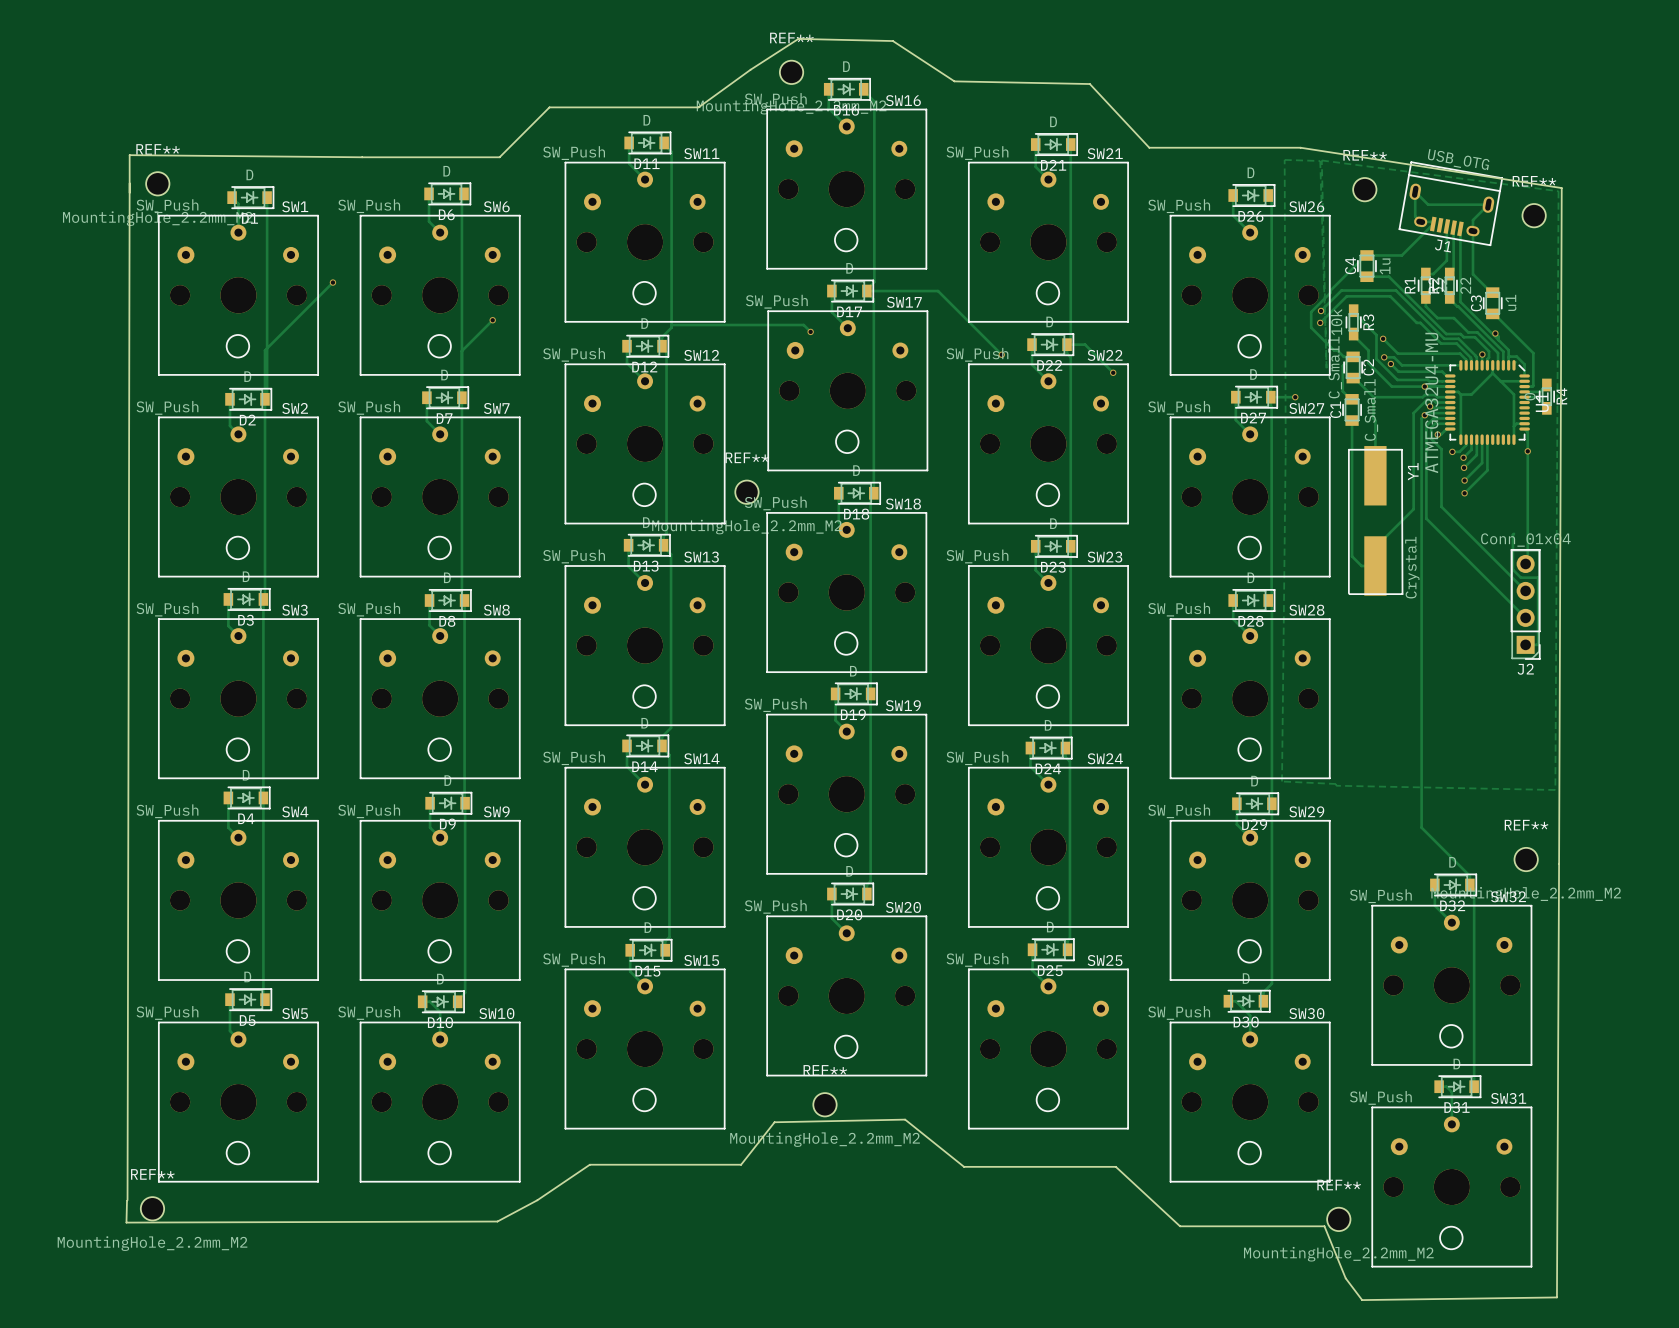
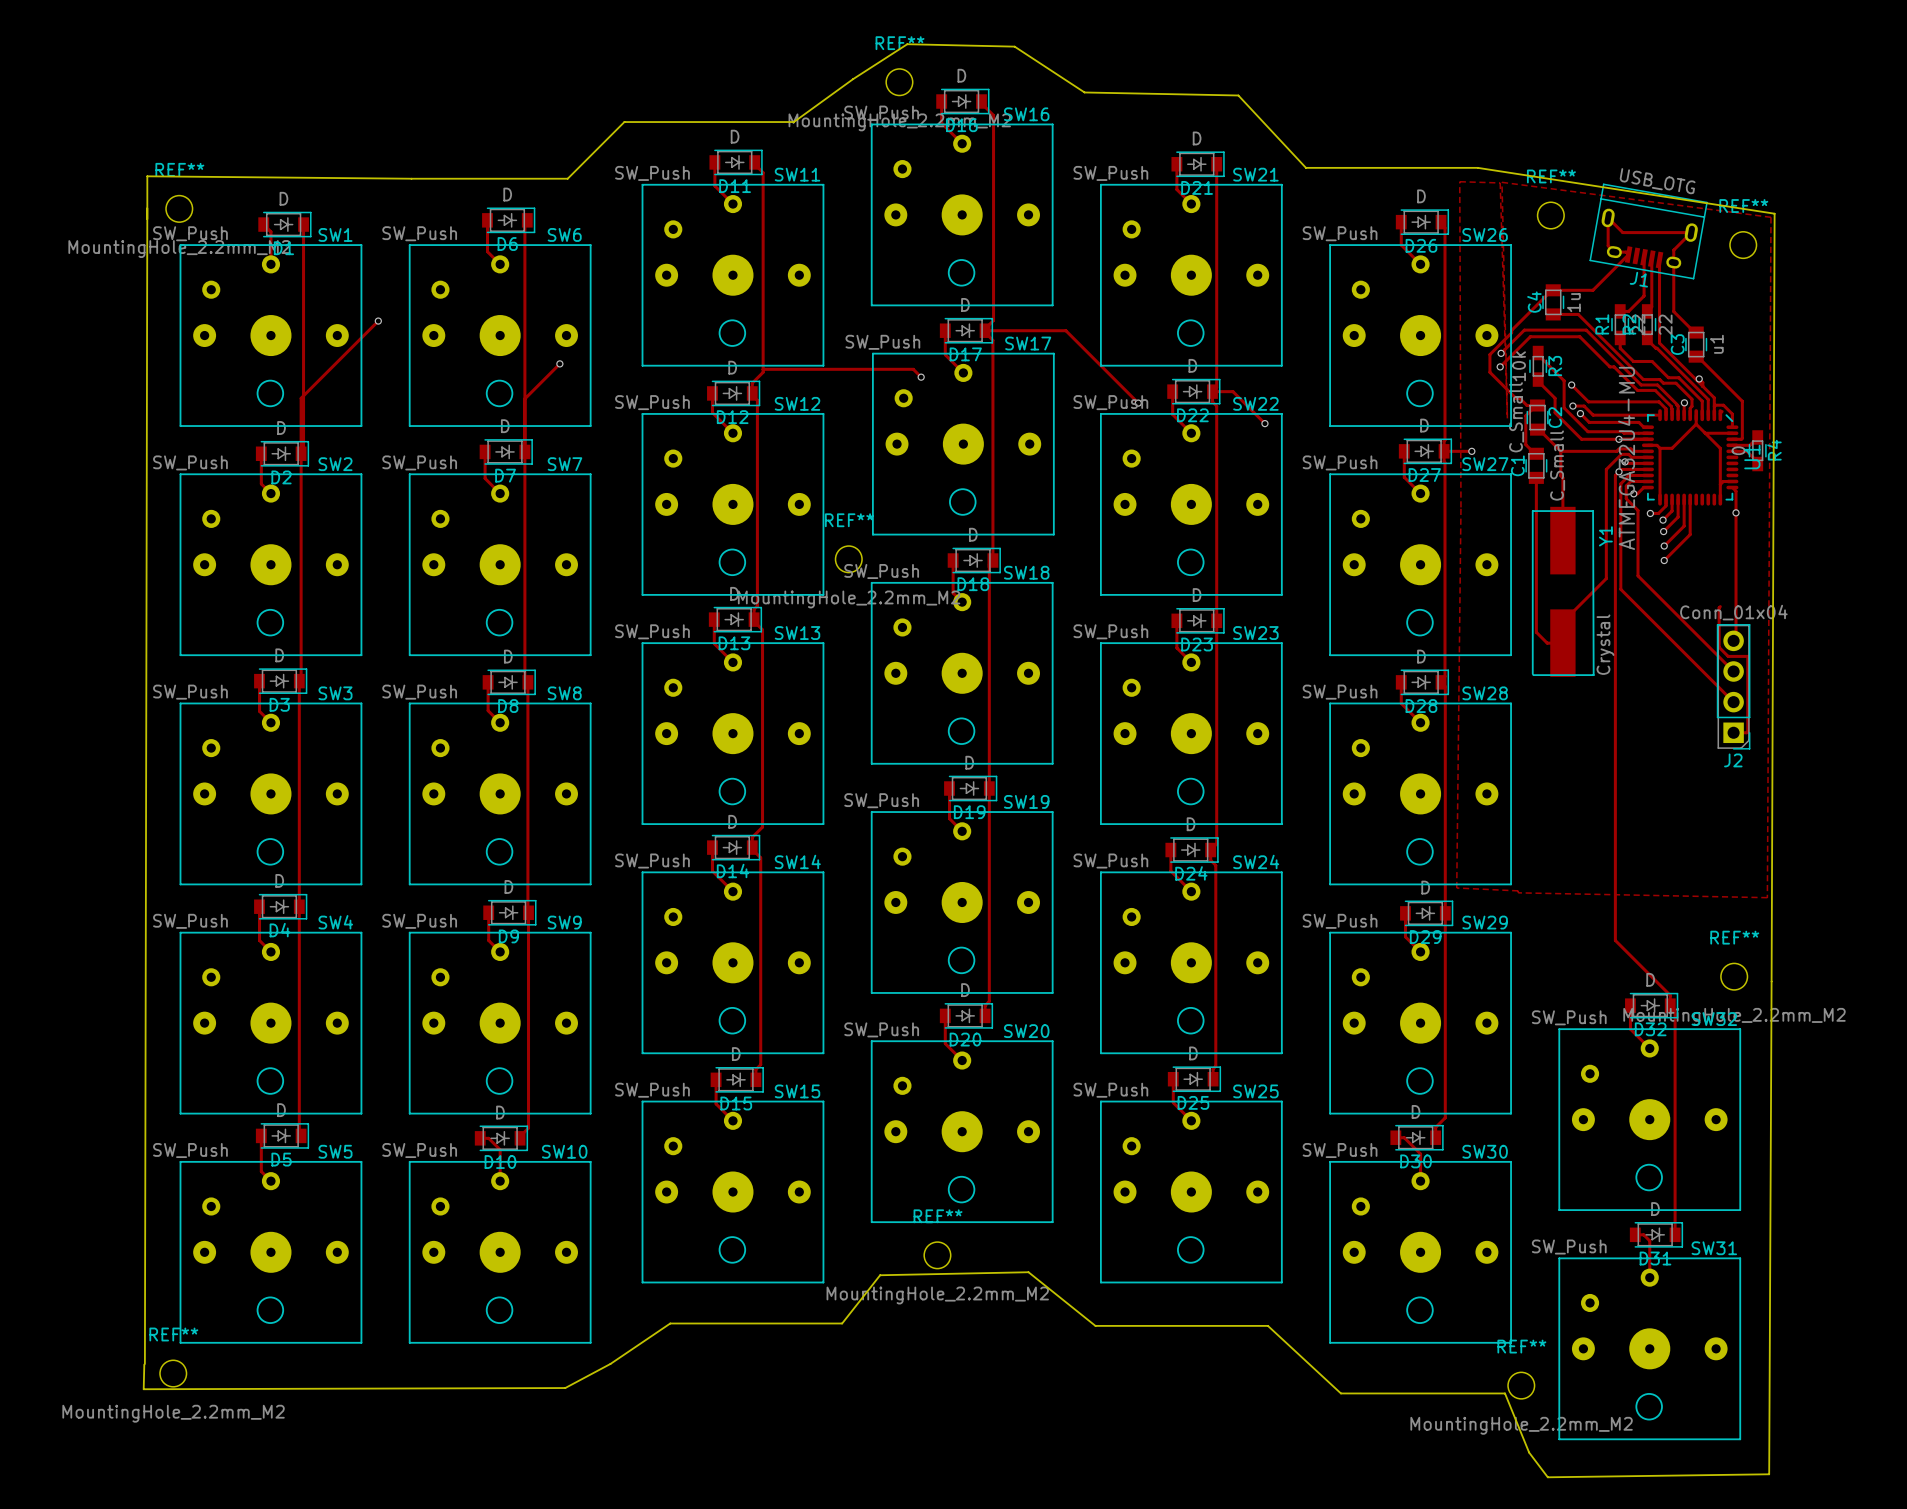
SW16 footprint: [766, 108, 928, 270] -> [870, 123, 1054, 307]
SW11 footprint: [564, 161, 726, 323] -> [641, 183, 825, 367]
SW21 footprint: [968, 161, 1129, 323] -> [1099, 183, 1283, 367]
SW1 footprint: [158, 214, 319, 376] -> [179, 244, 363, 427]
SW6 footprint: [359, 214, 521, 376] -> [408, 244, 592, 427]
SW26 footprint: [1169, 214, 1331, 376] -> [1329, 244, 1512, 427]
SW17 footprint: [767, 310, 929, 472] -> [872, 352, 1055, 536]
SW12 footprint: [564, 363, 726, 525] -> [641, 413, 825, 596]
SW22 footprint: [968, 363, 1129, 525] -> [1099, 413, 1283, 596]
SW2 footprint: [158, 416, 319, 578] -> [179, 473, 363, 657]
SW7 footprint: [359, 416, 521, 578] -> [408, 473, 592, 657]
SW27 footprint: [1169, 416, 1331, 578] -> [1329, 473, 1512, 657]
SW18 footprint: [766, 512, 928, 673] -> [870, 581, 1054, 765]
SW13 footprint: [564, 565, 726, 727] -> [641, 642, 825, 825]
SW23 footprint: [968, 565, 1129, 727] -> [1099, 642, 1283, 825]
SW3 footprint: [158, 618, 319, 780] -> [179, 702, 363, 886]
SW8 footprint: [359, 618, 521, 780] -> [408, 702, 592, 886]
SW28 footprint: [1169, 618, 1331, 780] -> [1329, 702, 1512, 886]
SW19 footprint: [766, 713, 928, 875] -> [870, 811, 1054, 994]
SW14 footprint: [564, 766, 726, 928] -> [641, 871, 825, 1055]
SW24 footprint: [968, 766, 1129, 928] -> [1099, 871, 1283, 1055]
SW4 footprint: [158, 819, 319, 981] -> [179, 931, 363, 1115]
SW9 footprint: [359, 819, 521, 981] -> [408, 931, 592, 1115]
SW29 footprint: [1169, 819, 1331, 981] -> [1329, 931, 1512, 1115]
SW32 footprint: [1371, 904, 1533, 1066] -> [1558, 1028, 1742, 1212]
SW20 footprint: [766, 915, 928, 1077] -> [870, 1040, 1054, 1224]
SW15 footprint: [564, 968, 726, 1130] -> [641, 1100, 825, 1284]
SW25 footprint: [968, 968, 1129, 1130] -> [1099, 1100, 1283, 1284]
SW5 footprint: [158, 1021, 319, 1183] -> [179, 1160, 363, 1344]
SW10 footprint: [359, 1021, 521, 1183] -> [408, 1160, 592, 1344]
SW30 footprint: [1169, 1021, 1331, 1183] -> [1329, 1160, 1512, 1344]
SW31 footprint: [1371, 1106, 1533, 1268] -> [1558, 1257, 1742, 1441]

